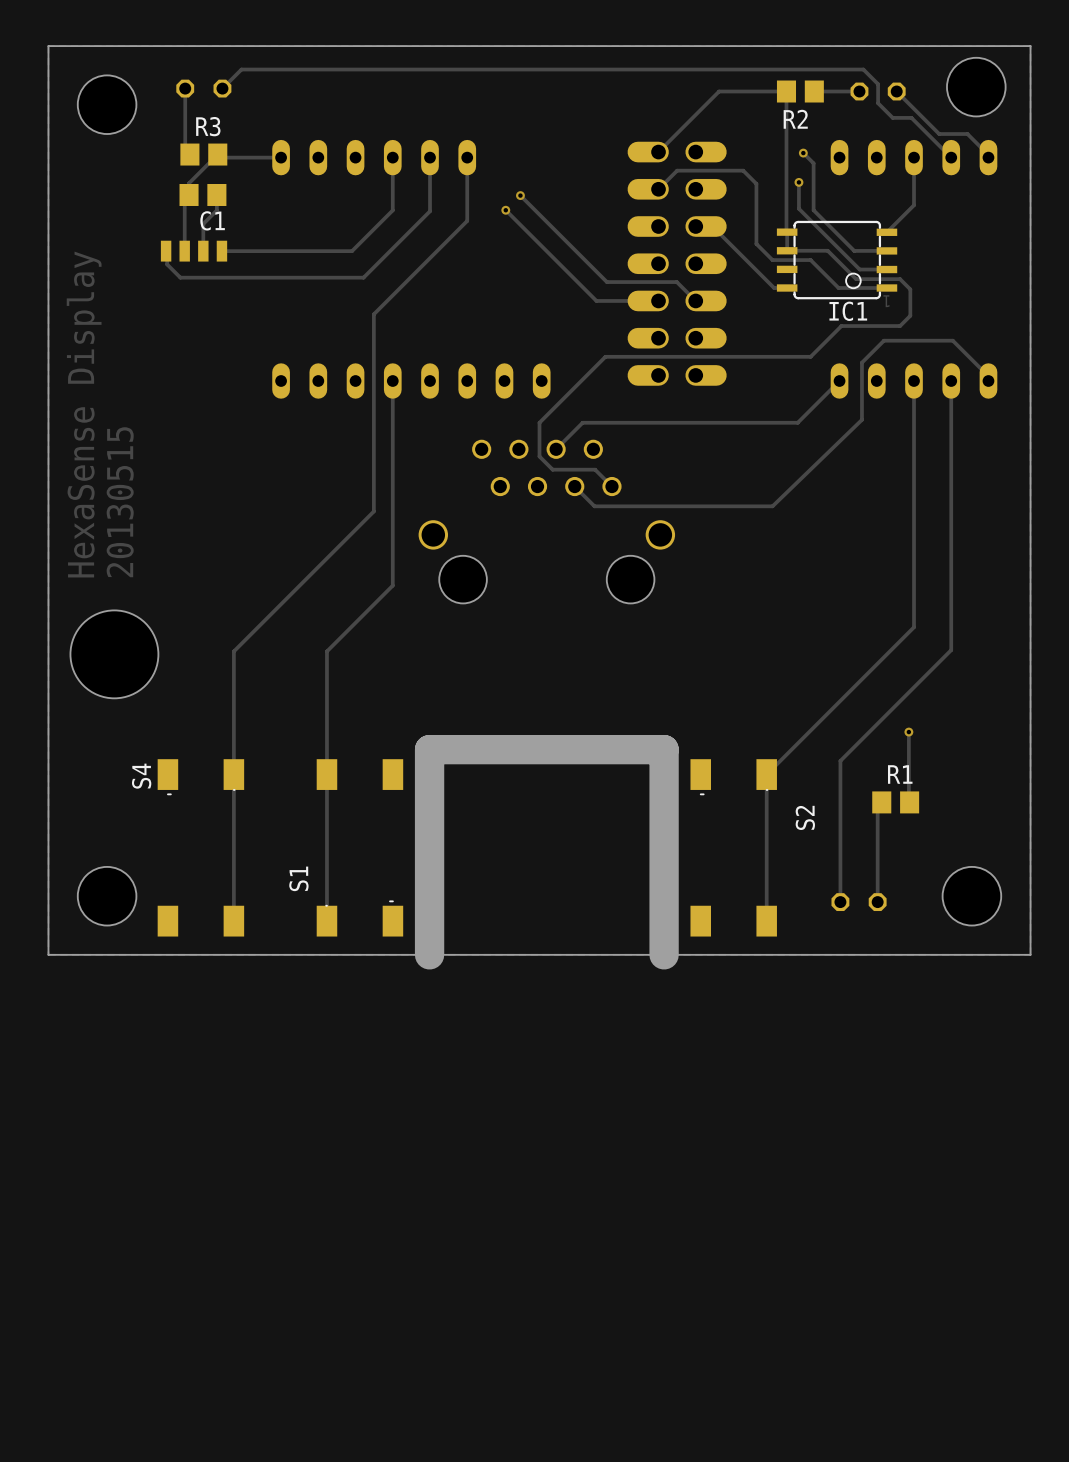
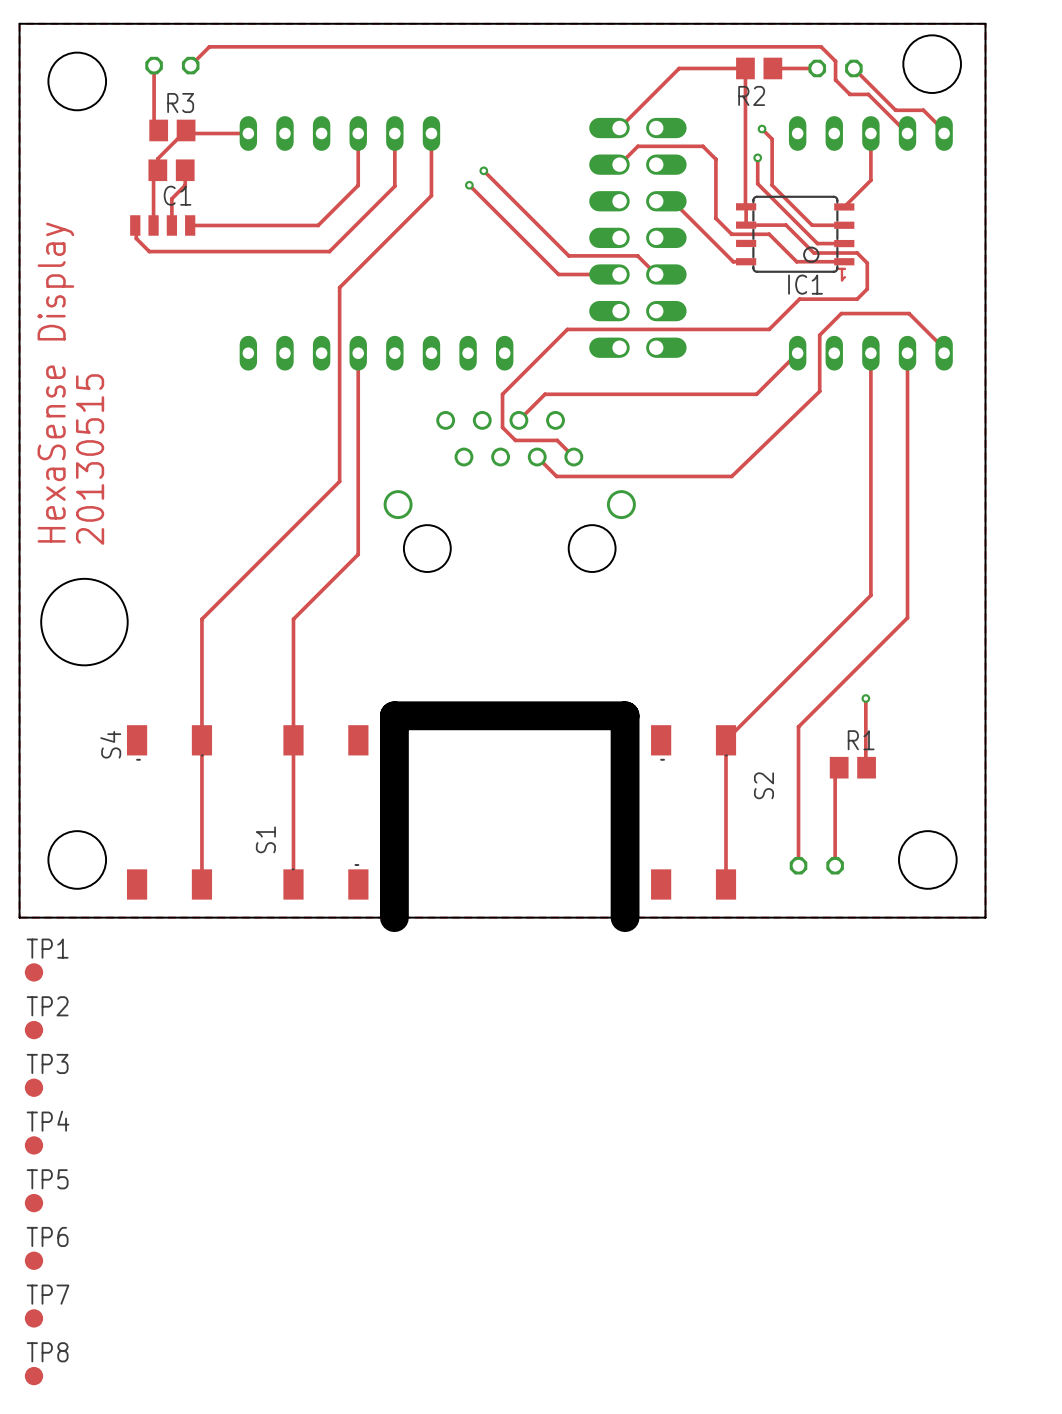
TP1: none -> (33, 972)
TP2: none -> (33, 1030)
TP3: none -> (33, 1087)
TP4: none -> (33, 1145)
TP5: none -> (33, 1203)
TP6: none -> (33, 1260)
TP7: none -> (33, 1318)
TP8: none -> (33, 1376)

